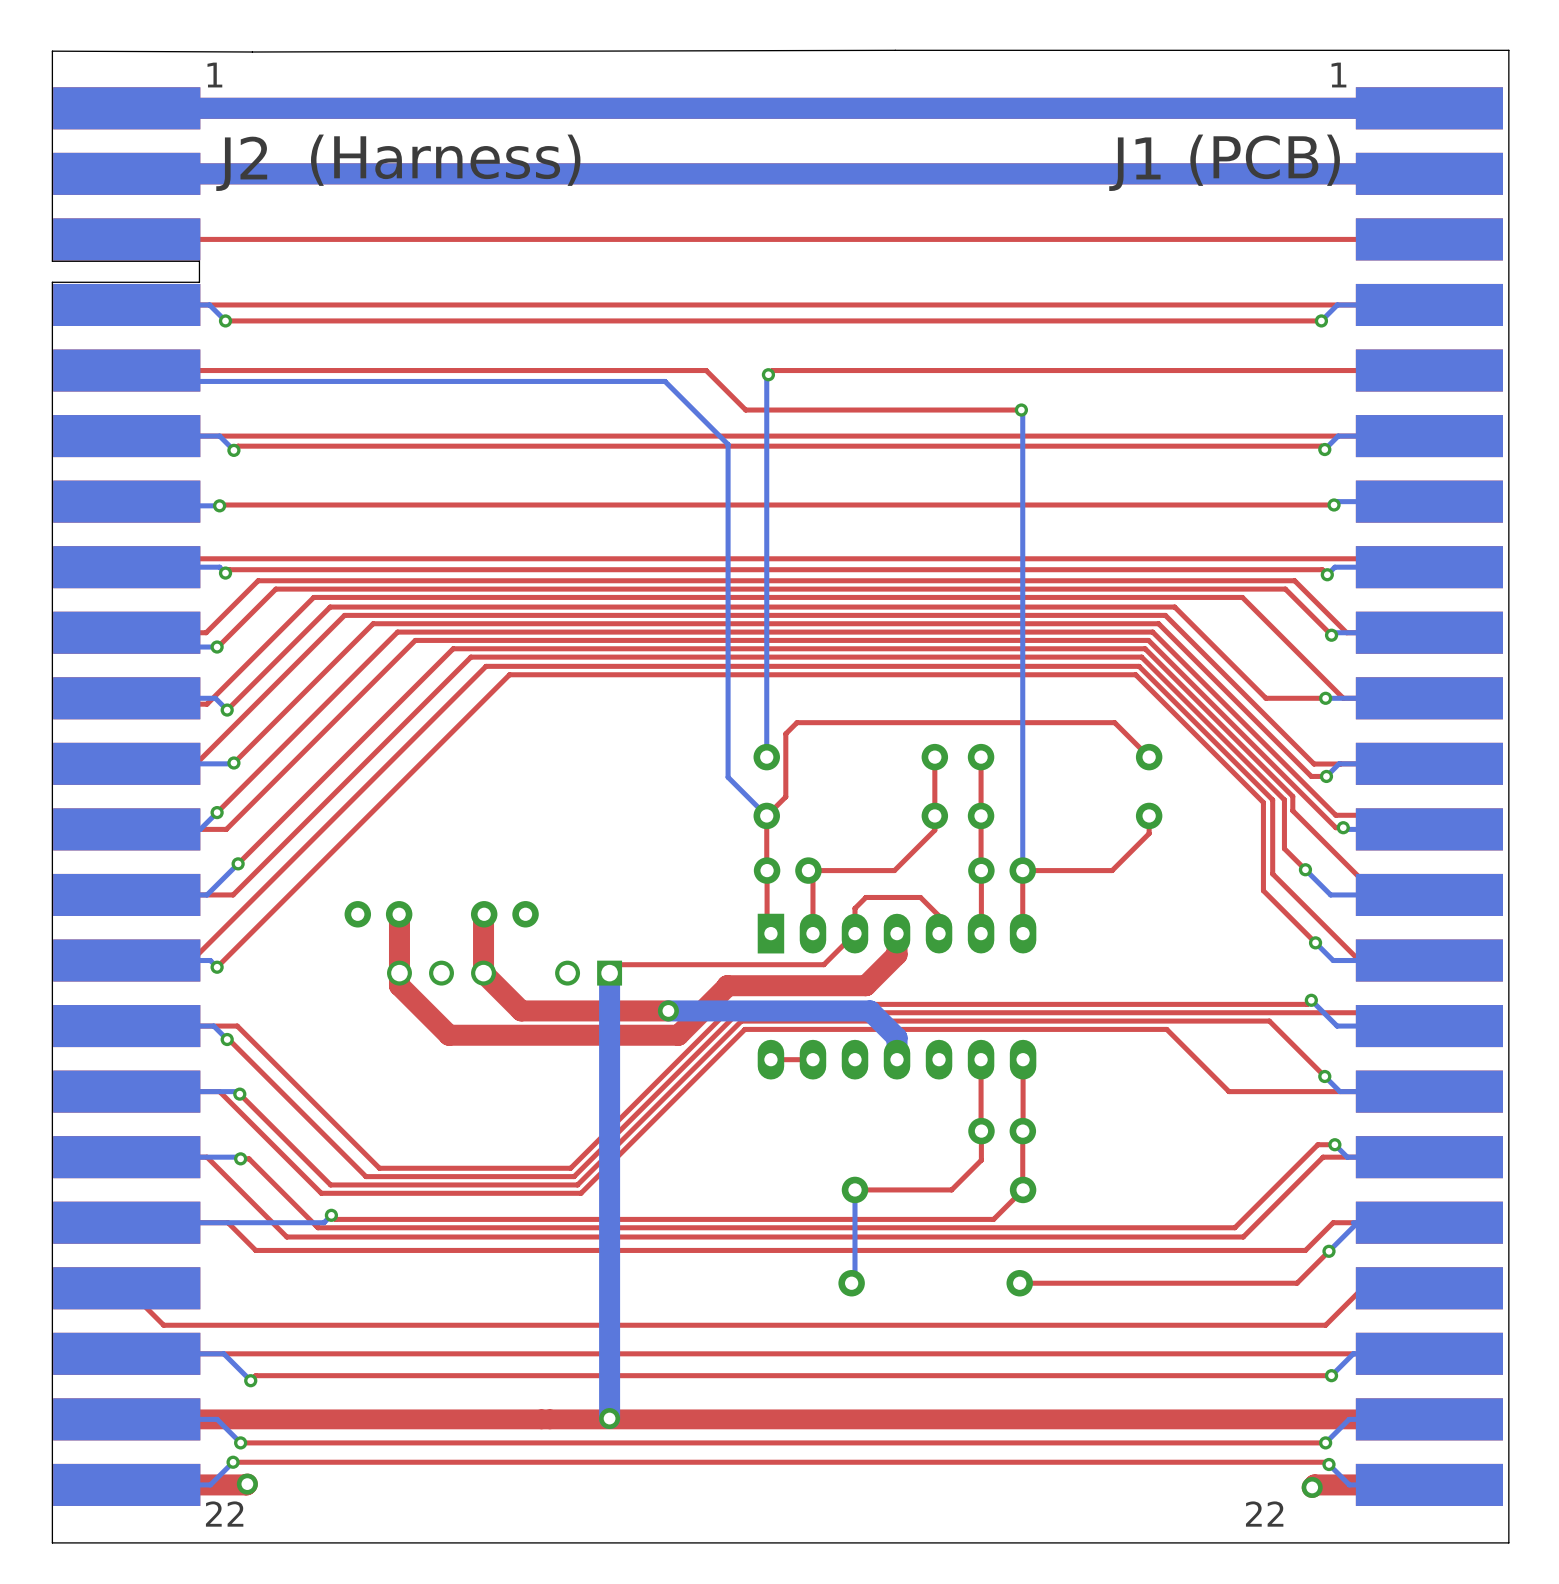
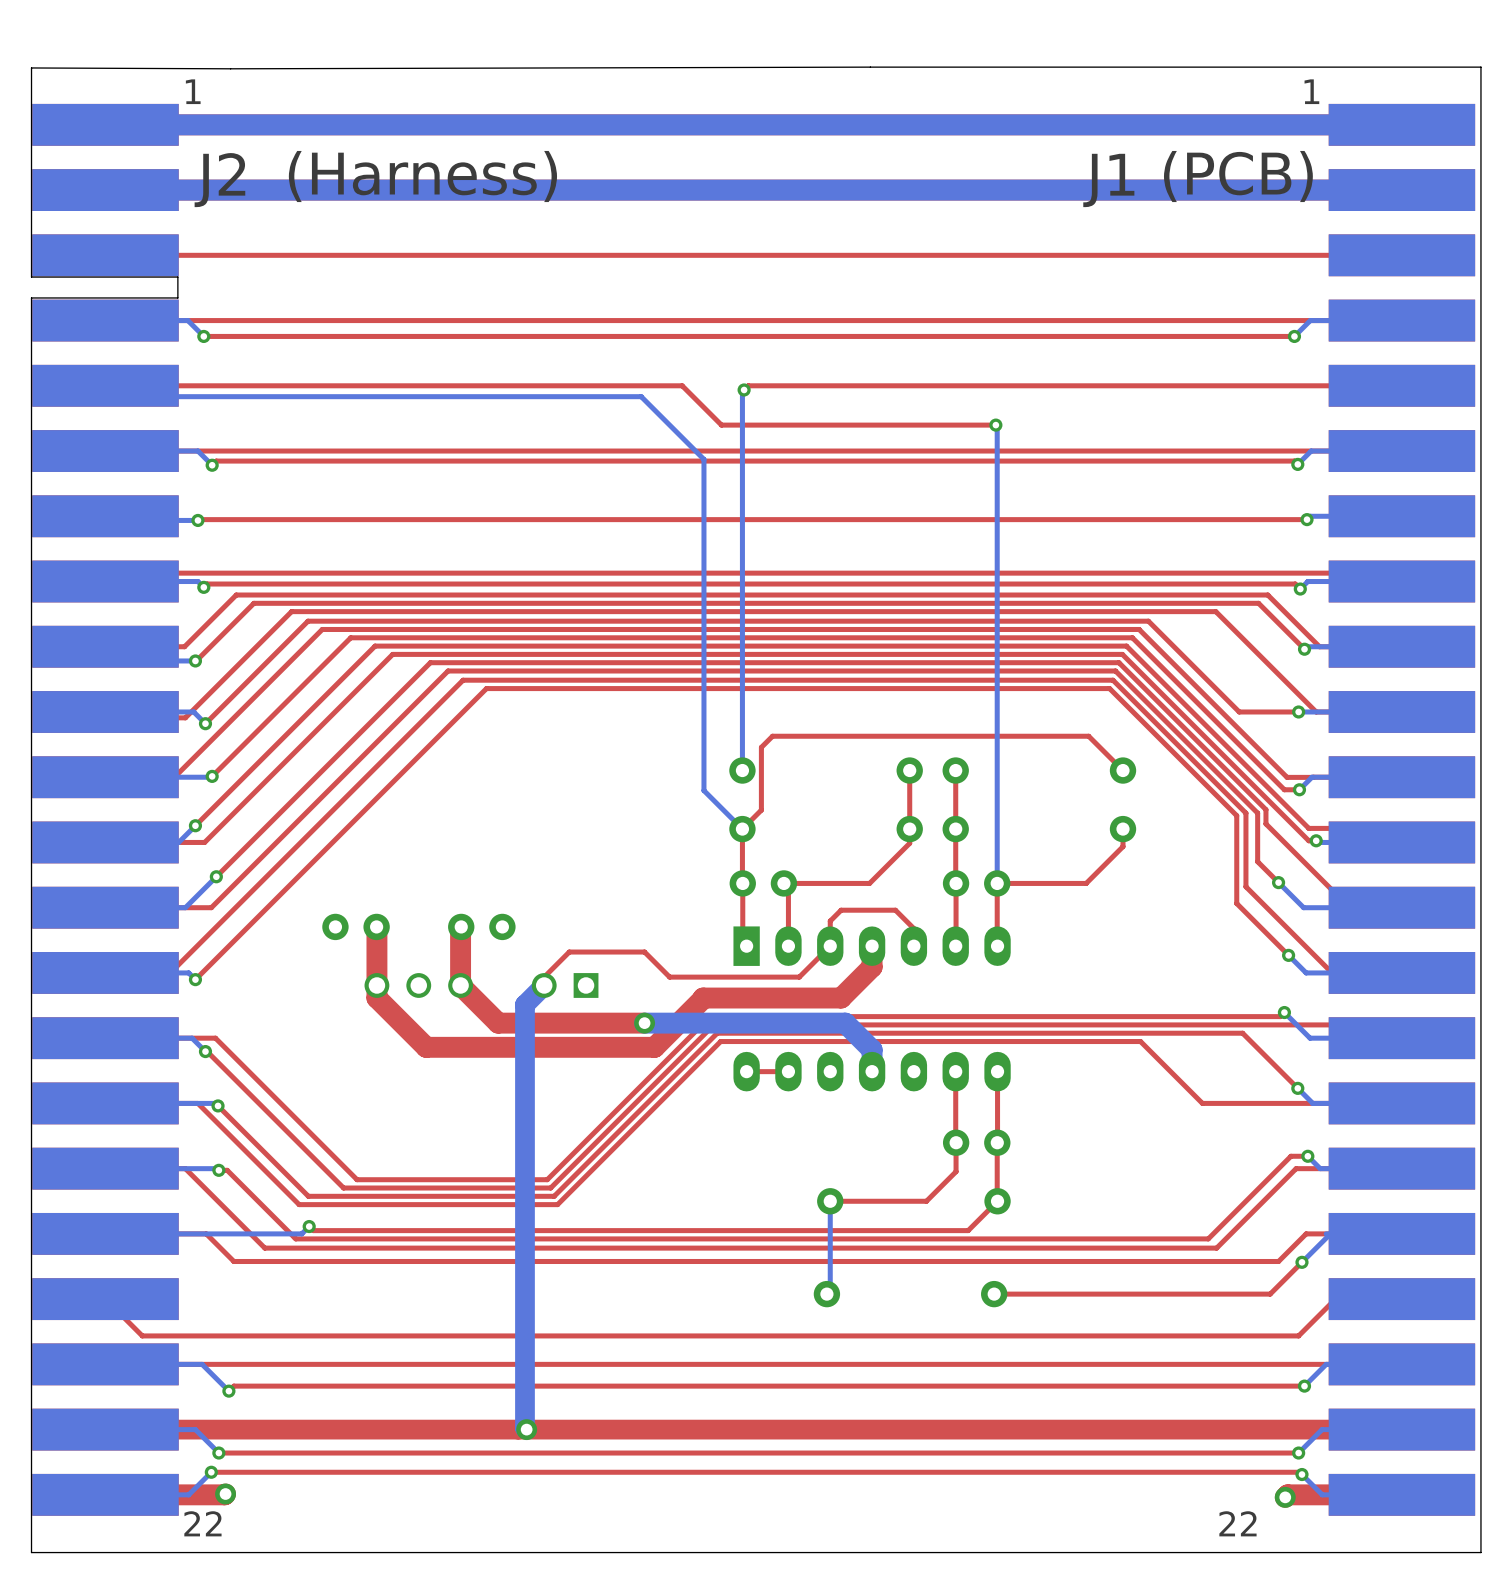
top track: (693, 964) (617, 964) (609, 973) -> (669, 977) (644, 952) (569, 952) (544, 977) (544, 985)
bottom track: none -> (544, 985) (524, 1004) (524, 1427) (526, 1429)
bottom track: (609, 973) (609, 1418) -> none
via position: (609, 1418) -> (526, 1429)

